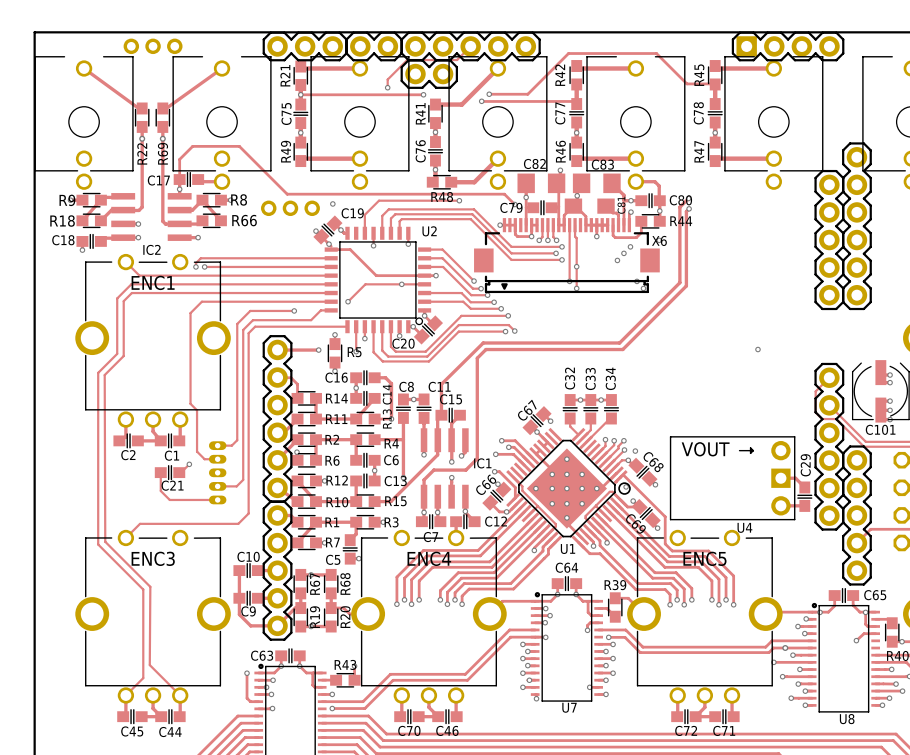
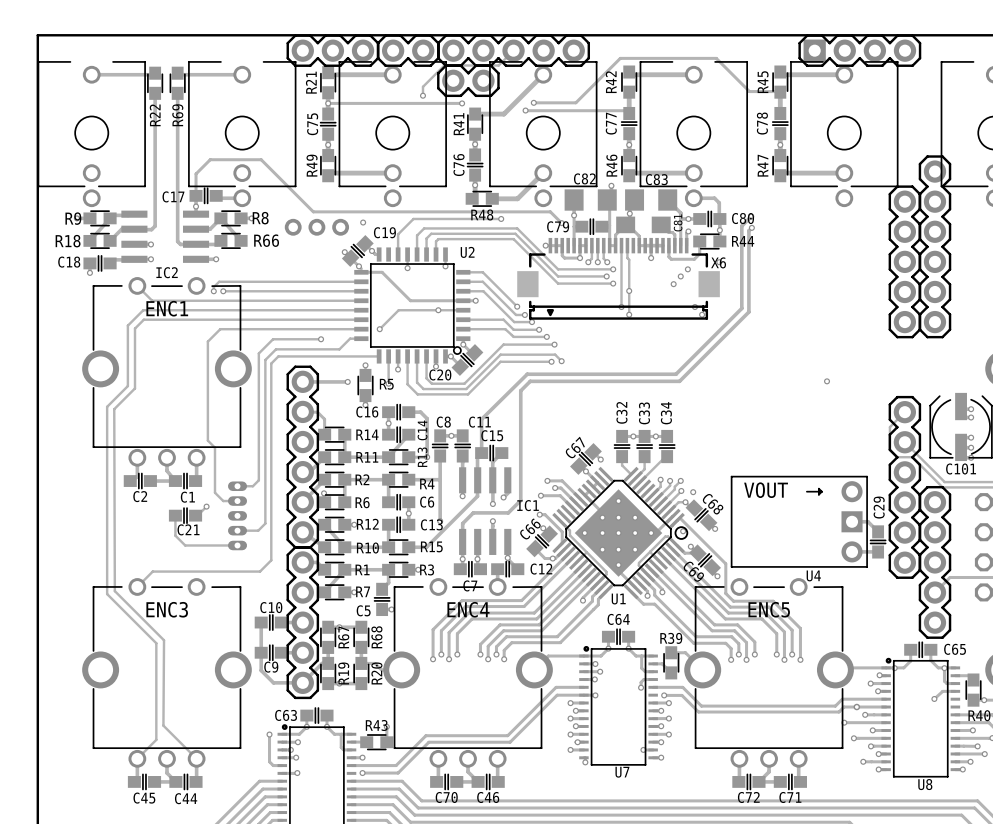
part: (153, 46) -> none
track: (84, 68) (140, 109) (142, 108) -> (91, 74) (153, 74) (155, 73)
track: (222, 68) (164, 109) (162, 108) -> (242, 74) (179, 74) (177, 73)
track: none -> (155, 93) (155, 138)
track: none -> (177, 93) (177, 138)
R22 position: (142, 117) -> (155, 83)
R69 position: (162, 117) -> (177, 83)
via: (142, 138) -> none
via: (162, 138) -> none
R22 name position: R22 (142, 153) -> R22 (155, 115)
R69 name position: R69 (162, 153) -> R69 (177, 115)

